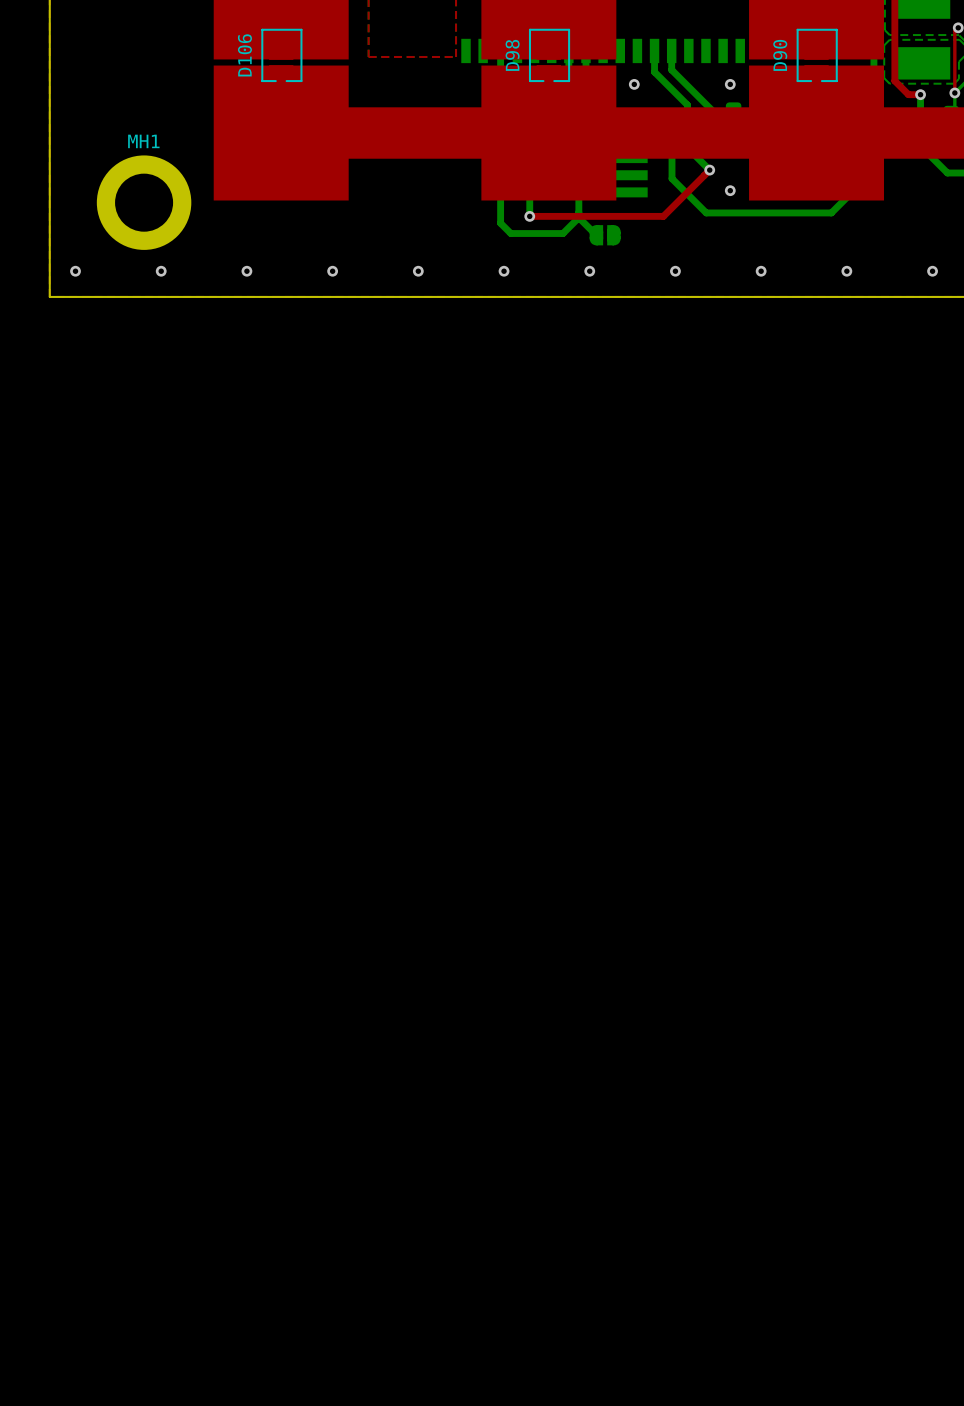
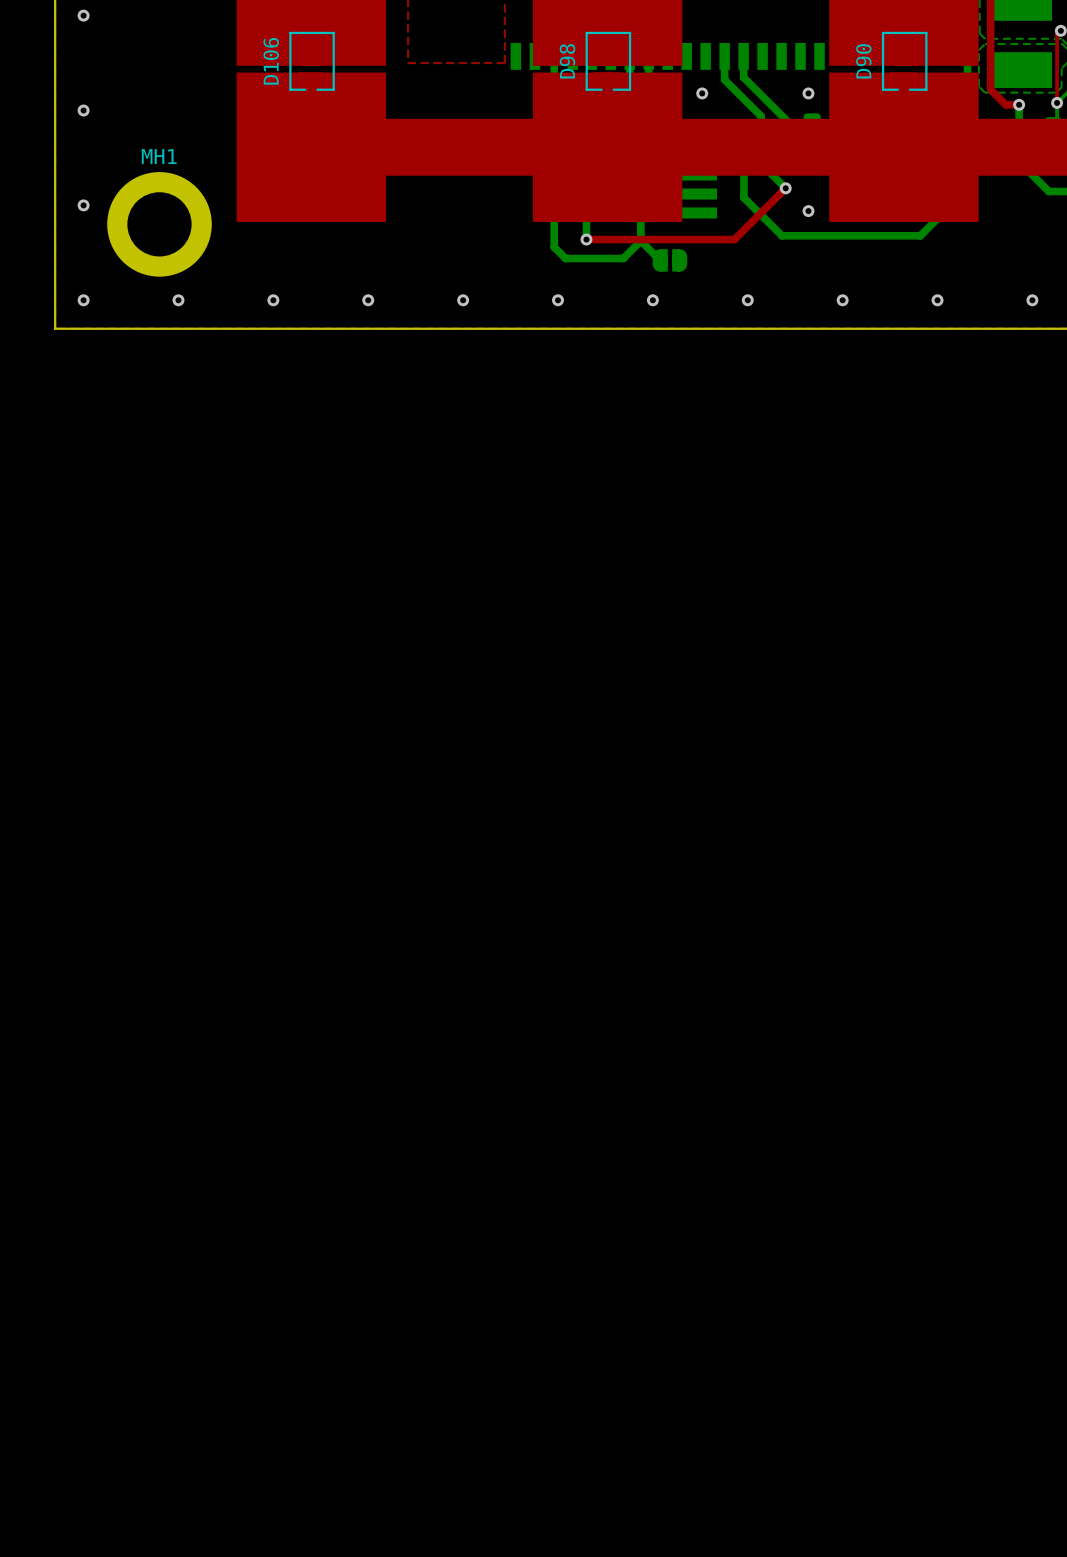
via: none -> (83, 15)
via: none -> (83, 110)
via: none -> (83, 205)

